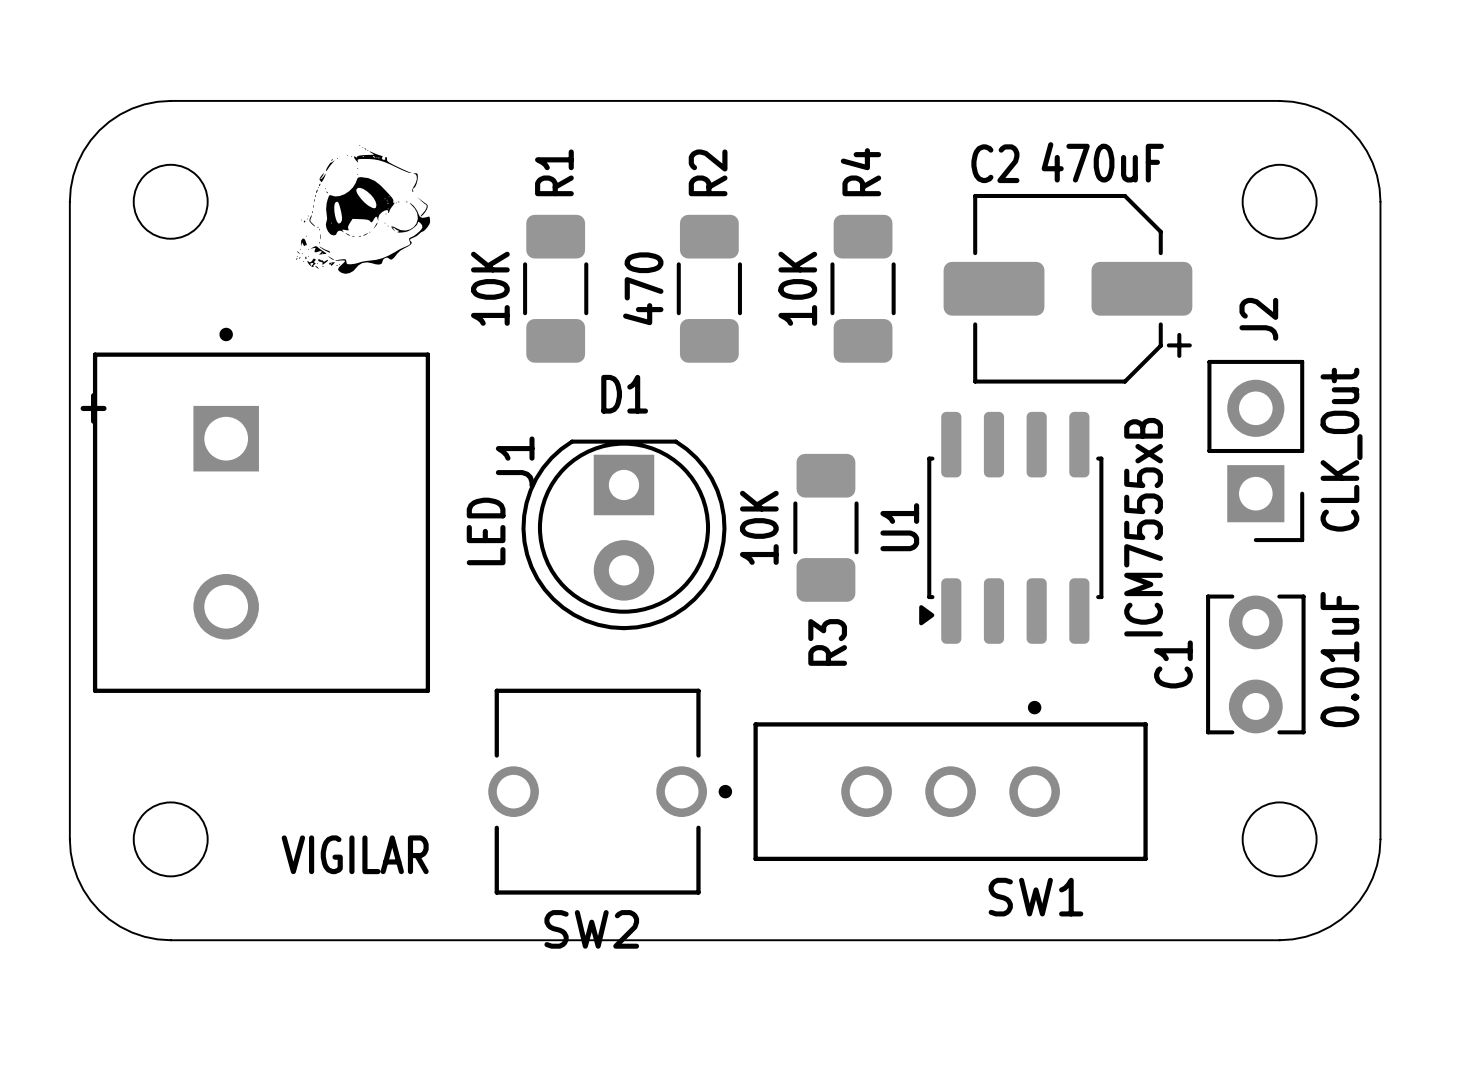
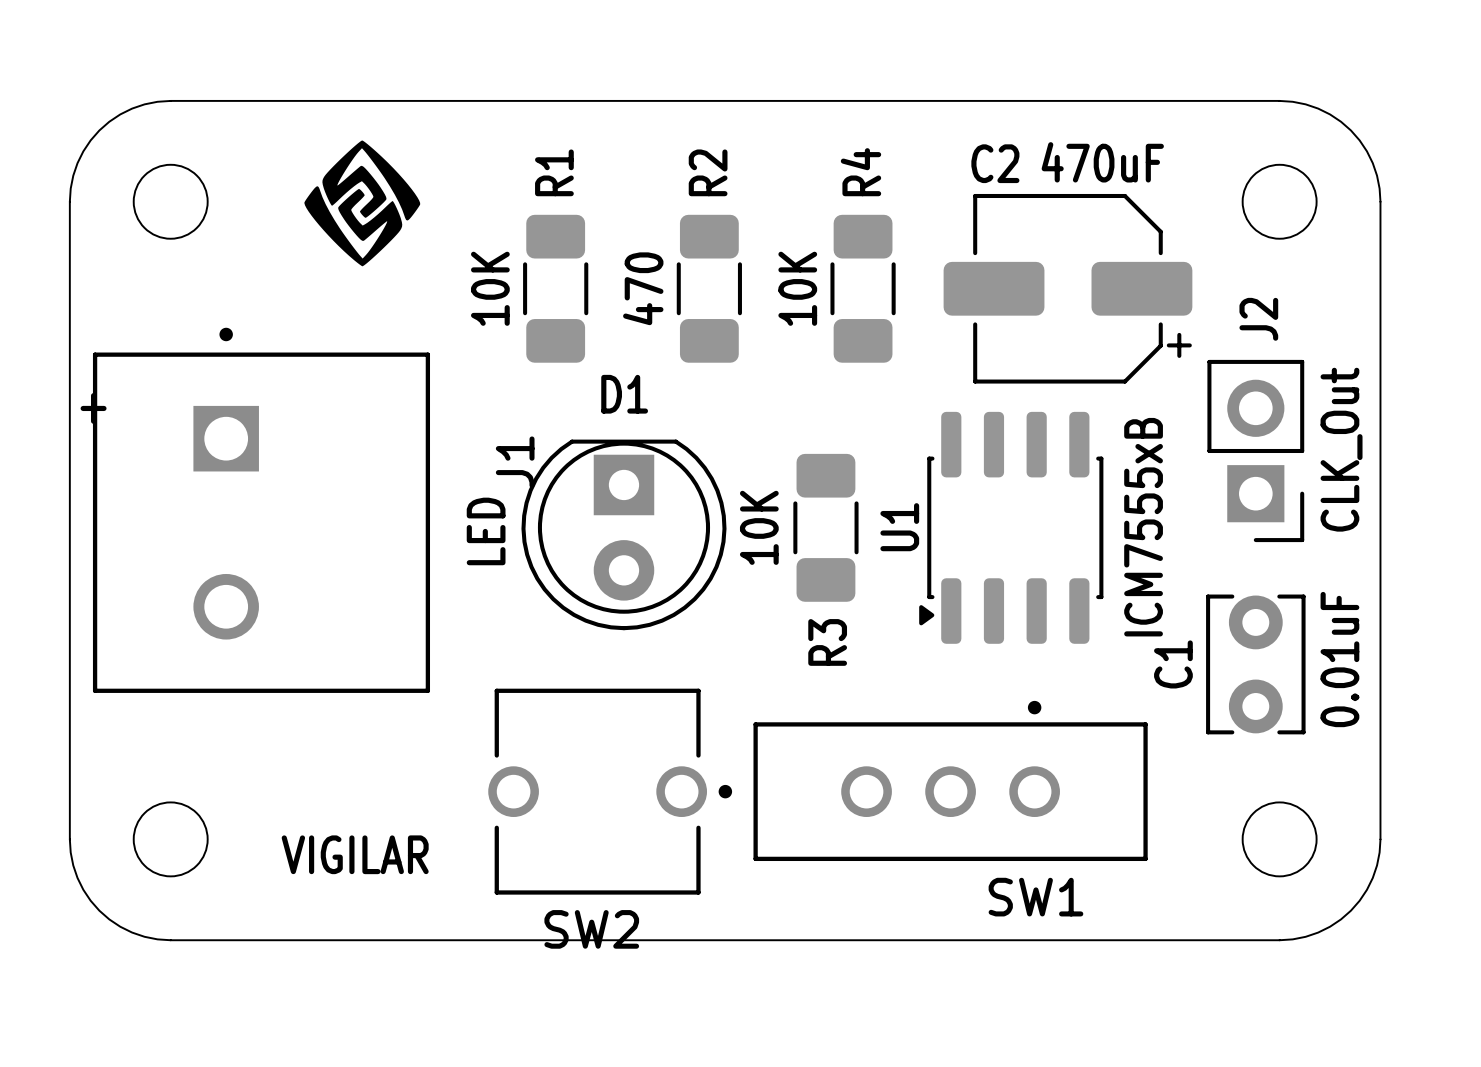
drawing shape: [296, 144, 431, 274] -> [304, 140, 421, 267]

